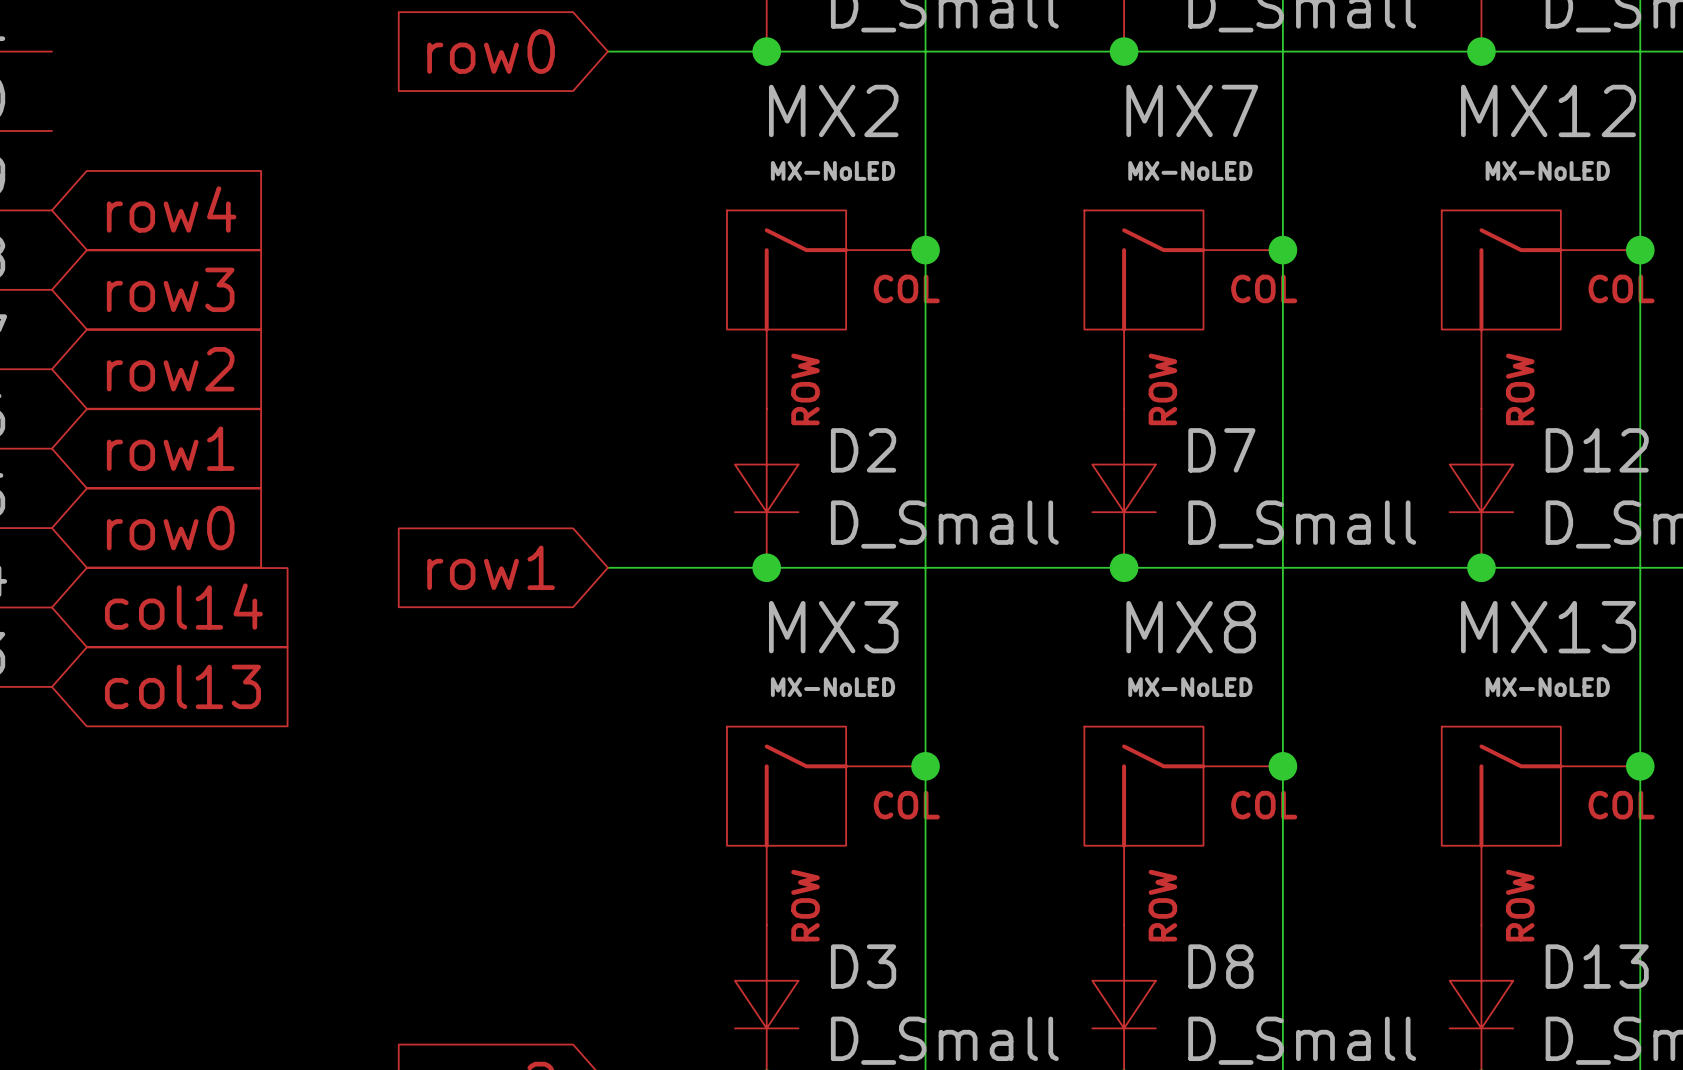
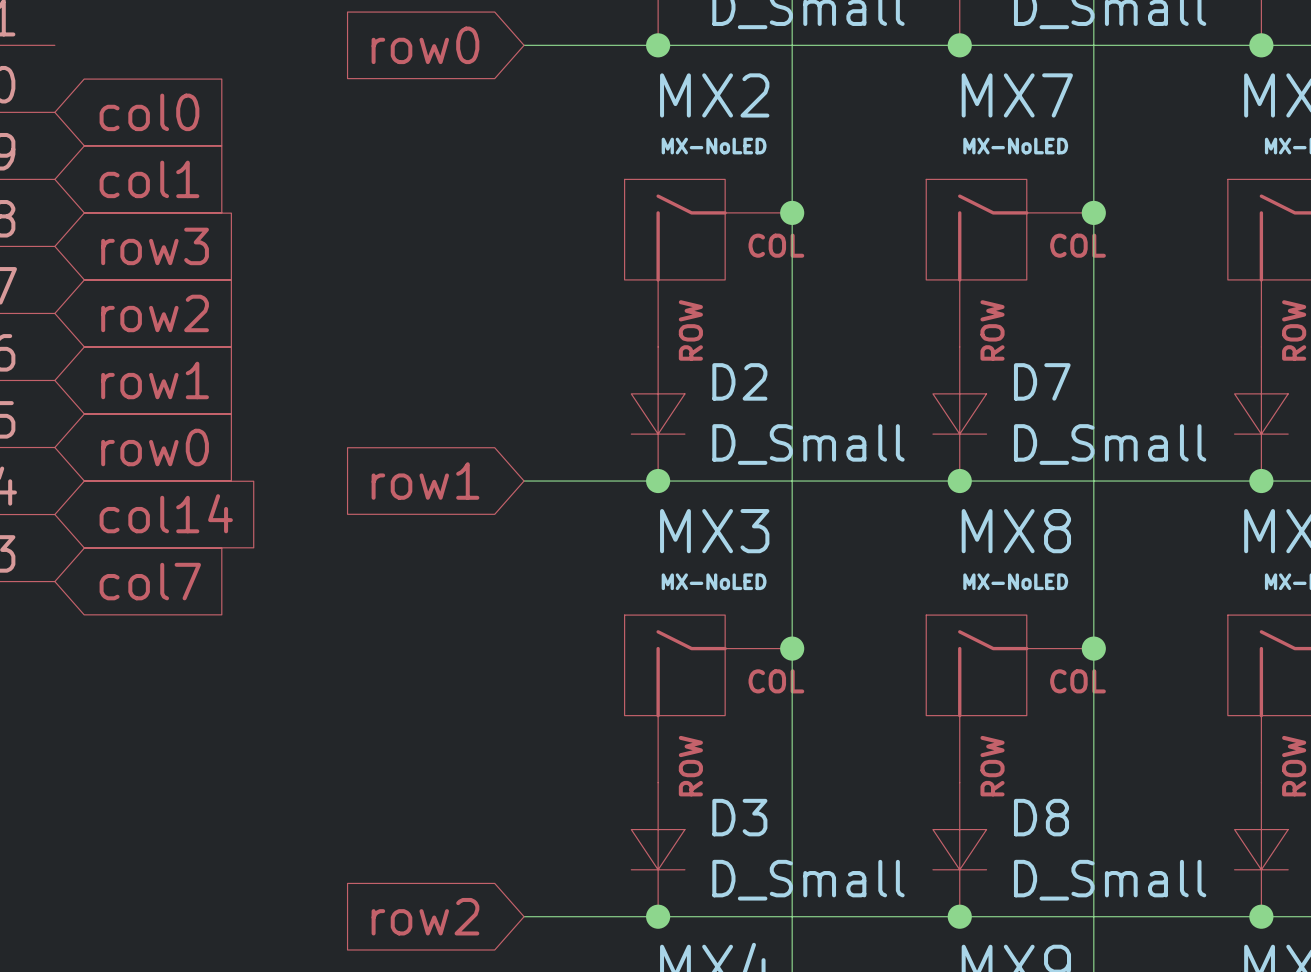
global label: none -> col0 (149, 112)
global label: row4 (171, 209) -> col1 (149, 179)
global label: col13 (182, 686) -> col7 (150, 581)

